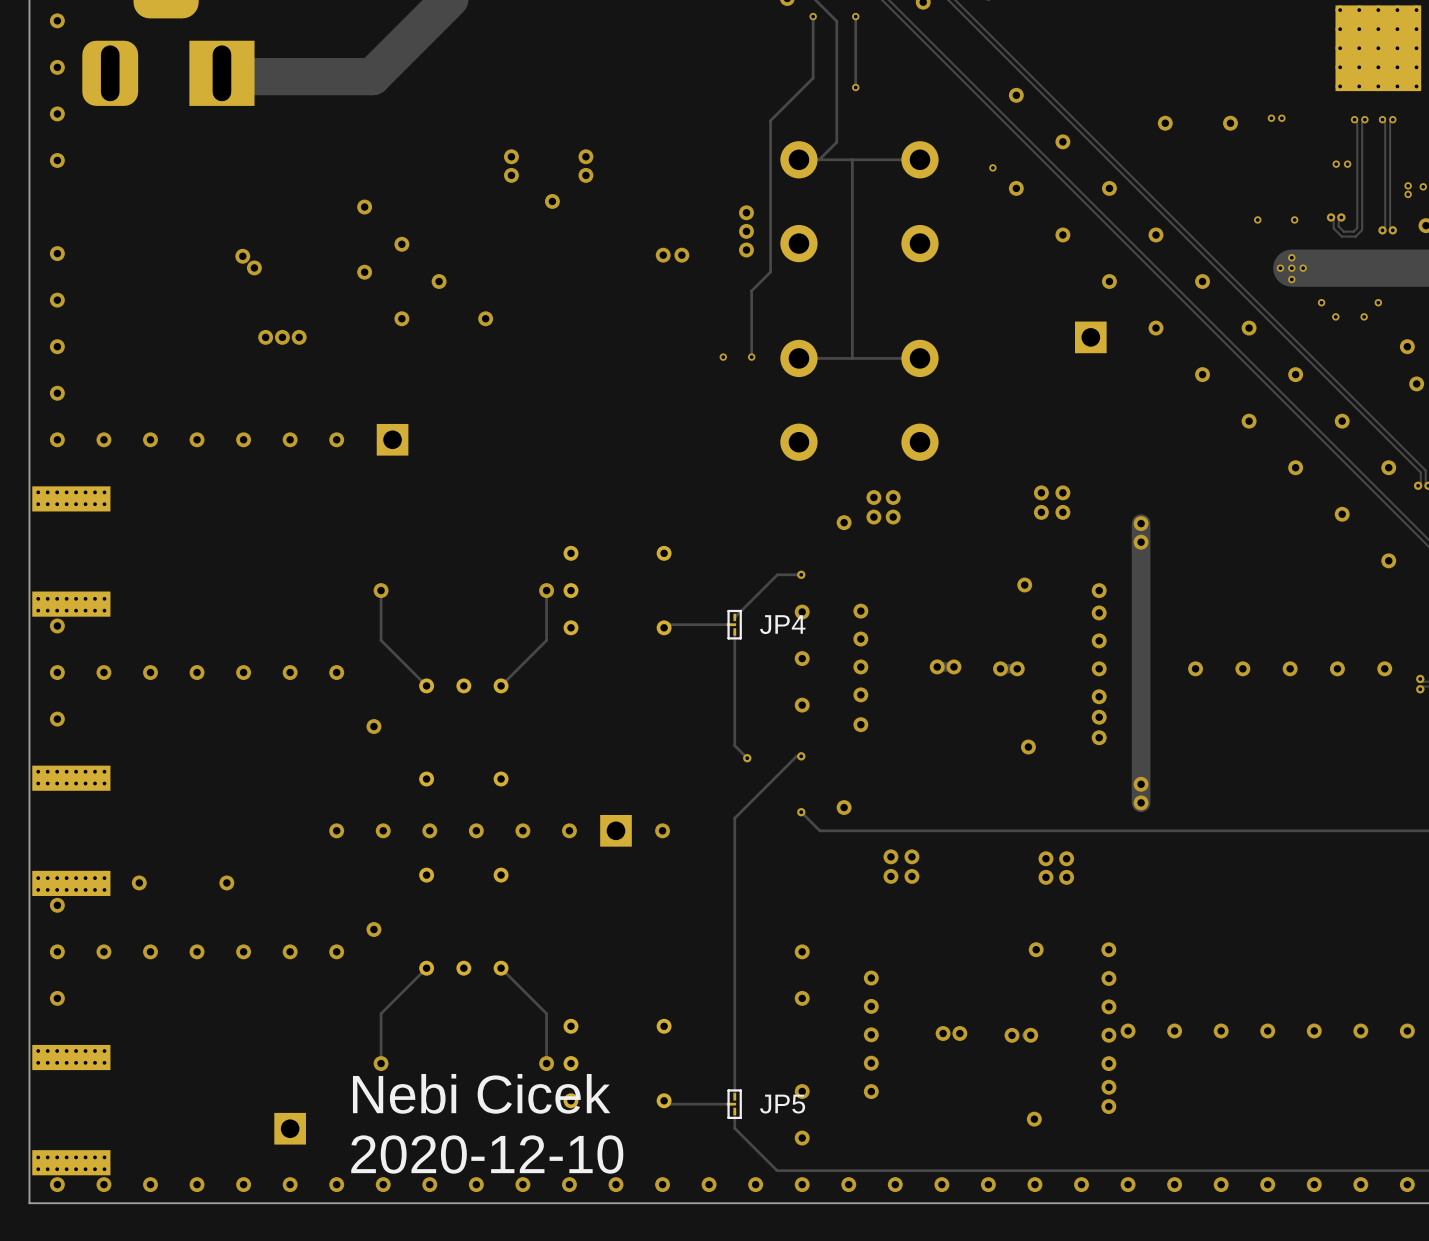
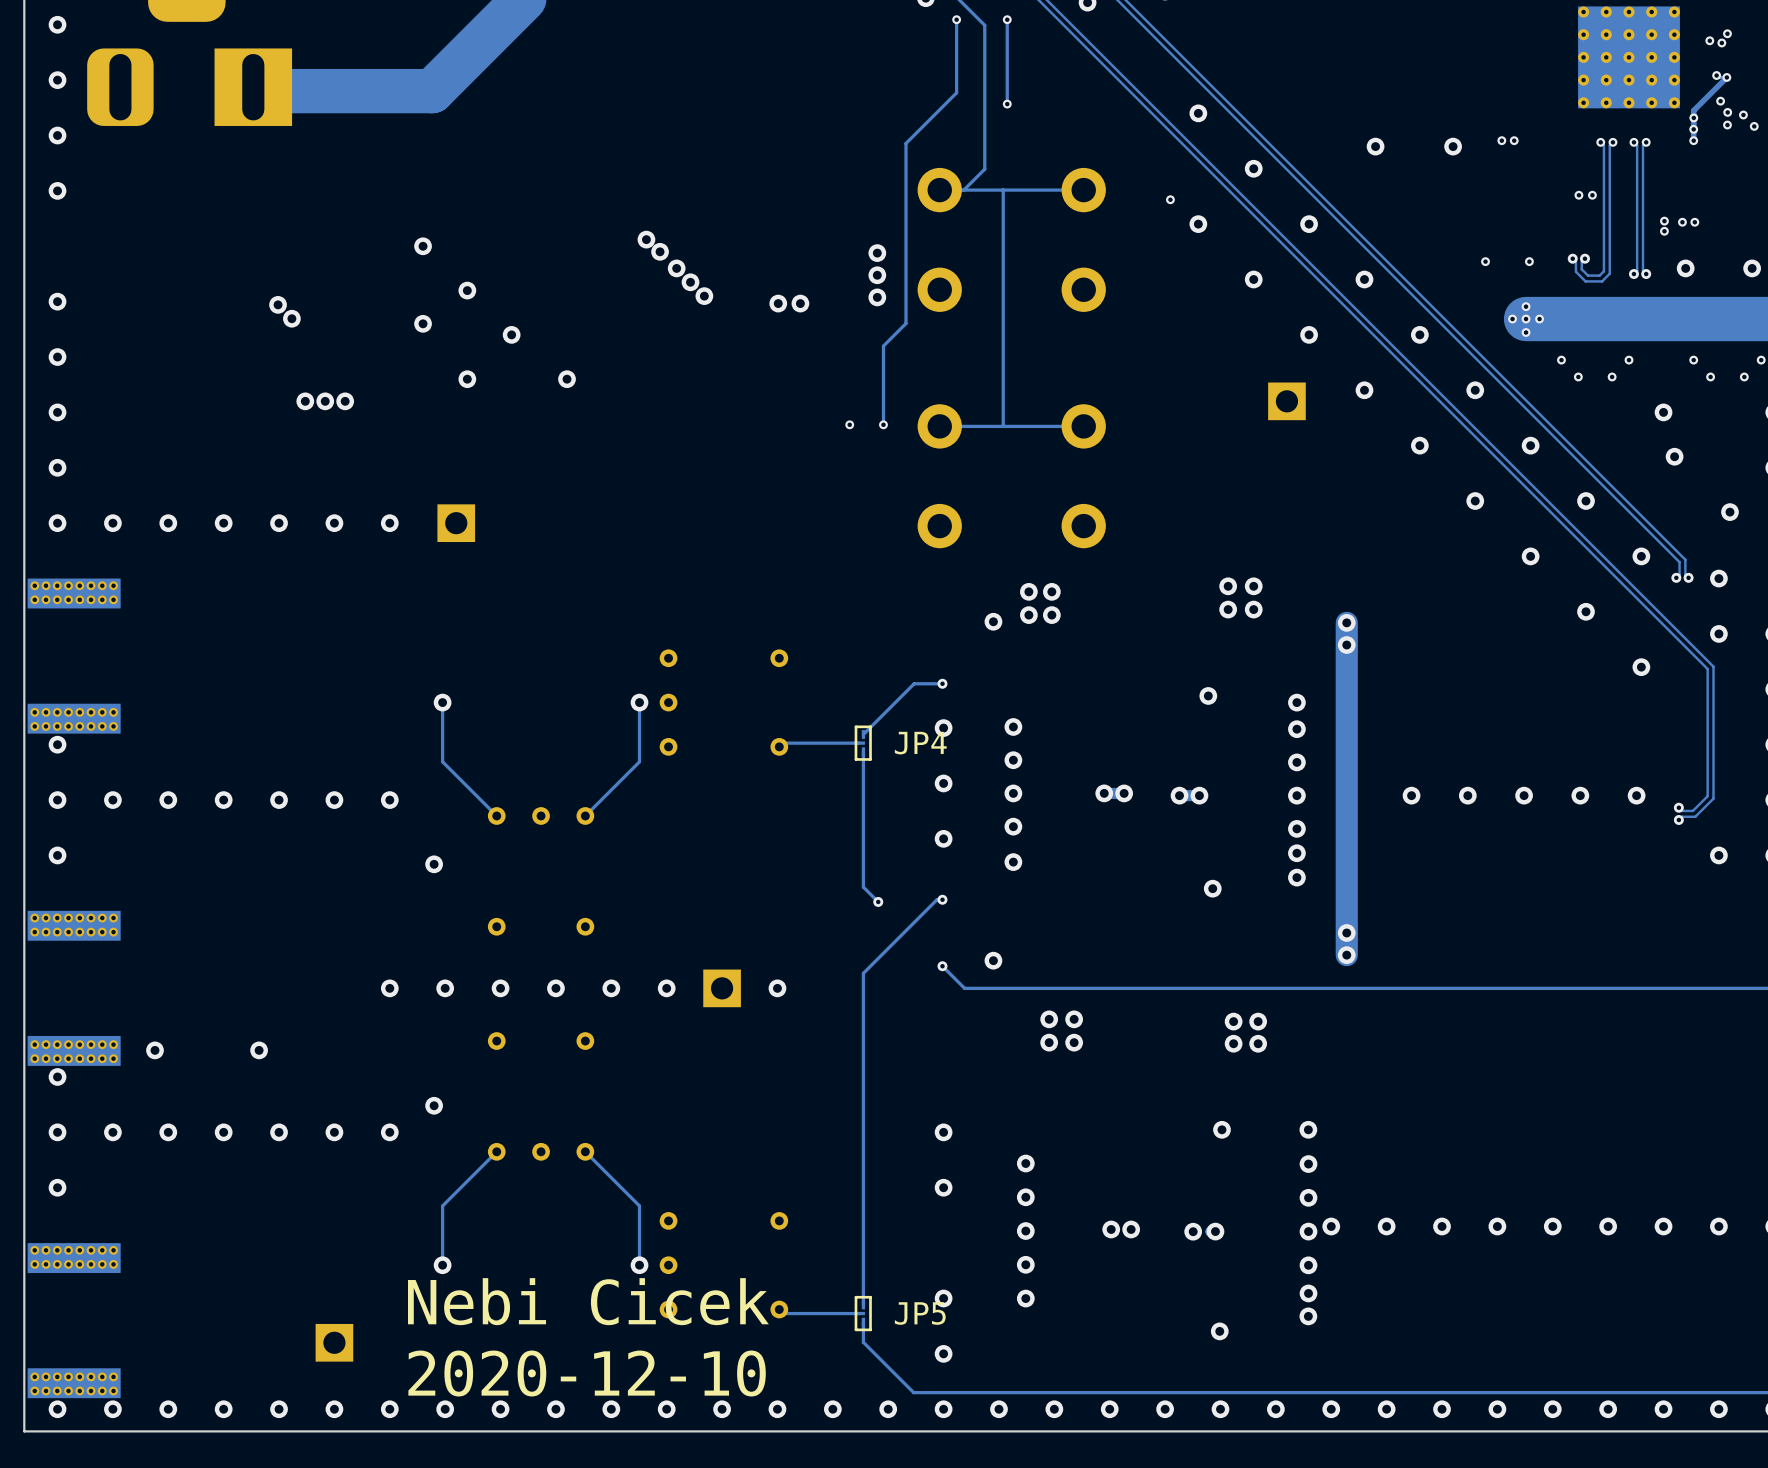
via: (511, 156) -> none
via: (585, 156) -> none
via: (511, 175) -> none
via: (585, 175) -> none
via: none -> (660, 251)
via: none -> (676, 268)
via: none -> (690, 282)
via: none -> (704, 296)

